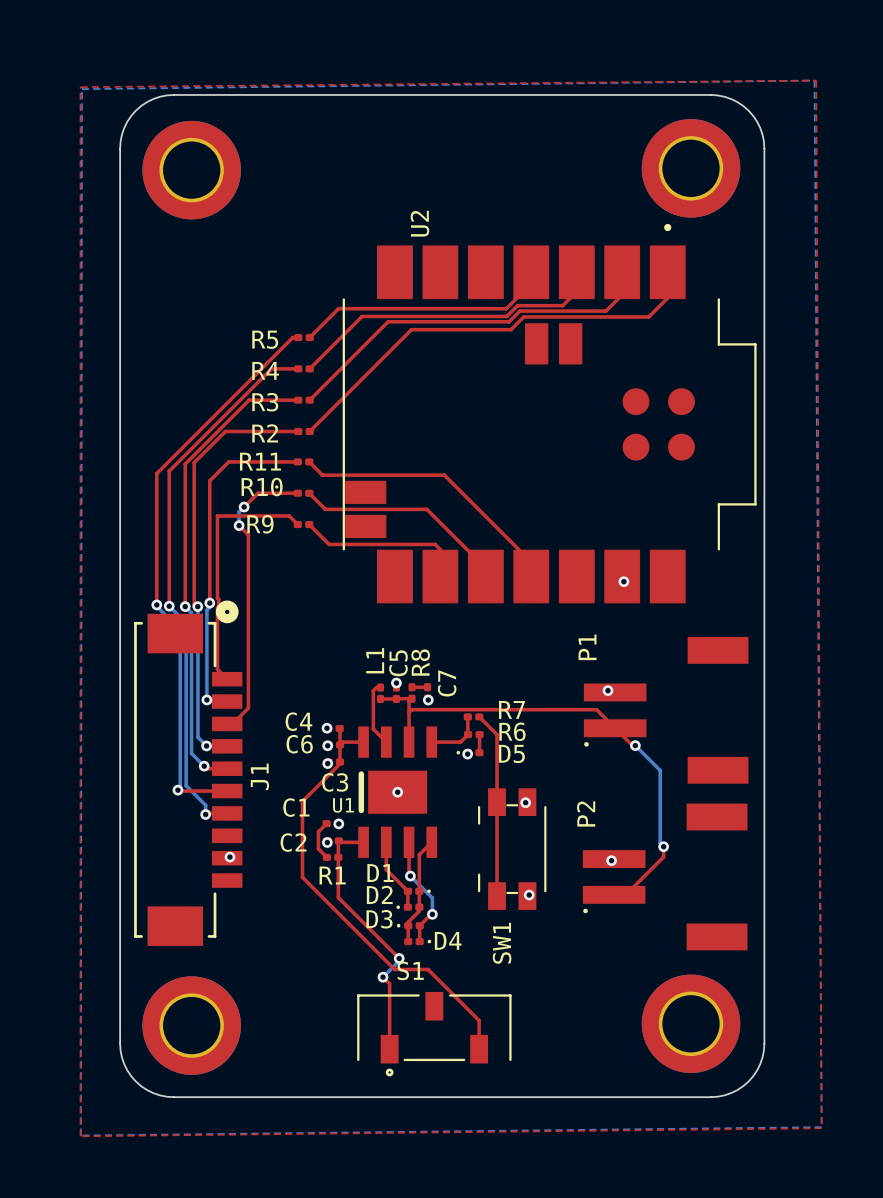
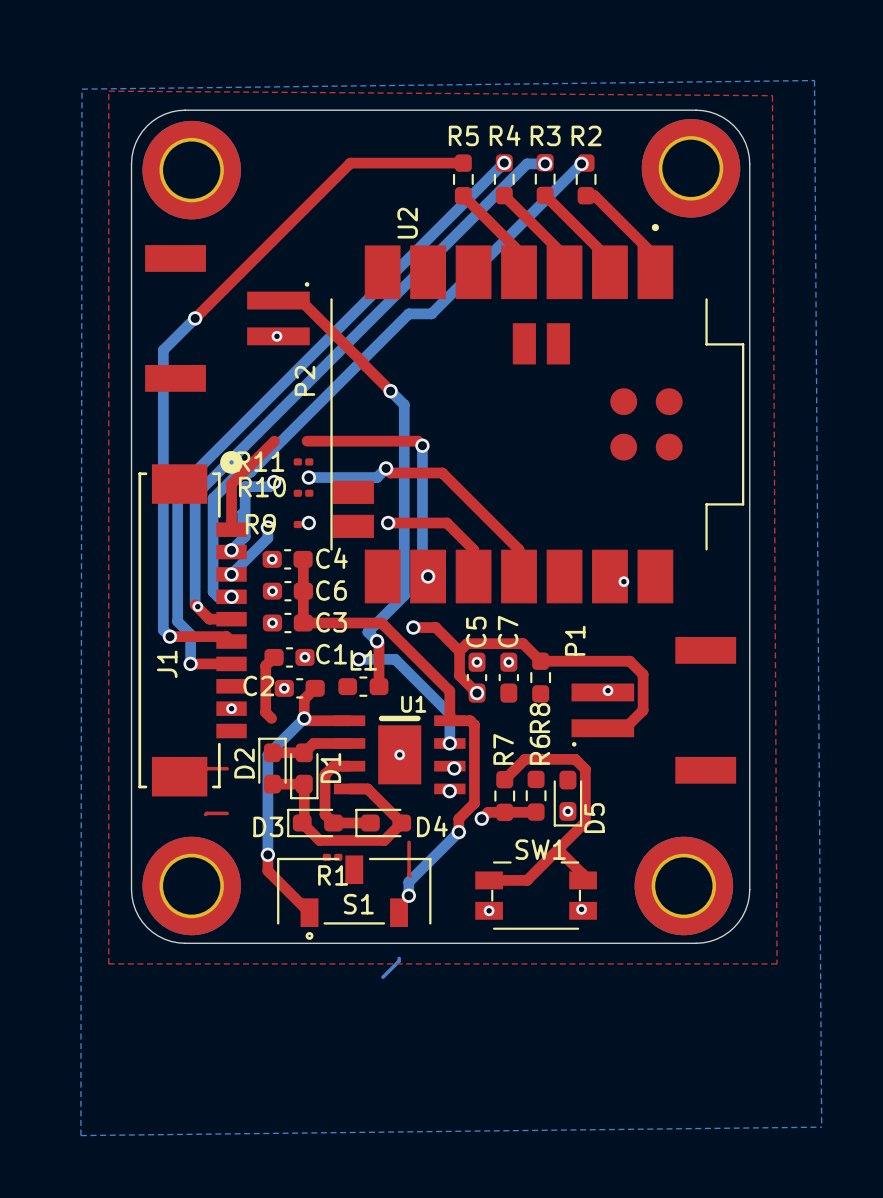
top zone outline: (816, 80) (80, 87) (80, 1136) (821, 1128) (816, 80) -> (108, 91) (108, 963) (777, 963) (772, 95) (108, 91)
board edge: (173, 94) (710, 94) (724, 96) (737, 102) (748, 110) (757, 121) (762, 134) (764, 148) (764, 1043) (762, 1057) (757, 1070) (748, 1081) (737, 1089) (724, 1095) (710, 1097) (173, 1097) (159, 1095) (146, 1089) (135, 1081) (127, 1070) (121, 1057) (120, 1043) (120, 148) (124, 128) (135, 110) (153, 99) (173, 94) -> (185, 110) (164, 114) (147, 125) (135, 143) (131, 163) (131, 889) (133, 903) (138, 916) (147, 927) (158, 936) (171, 941) (185, 943) (696, 943) (709, 941) (722, 936) (734, 927) (742, 916) (747, 903) (749, 889) (749, 163) (747, 149) (742, 137) (734, 125) (722, 117) (709, 112) (696, 110) (185, 110)
bottom track: none -> (504, 162) (177, 489) (177, 621) (190, 634) (190, 663)
via: none -> (504, 162)
top track: none -> (463, 163) (350, 163) (195, 318)
bottom track: none -> (545, 163) (527, 163) (195, 495) (195, 604)
via: none -> (545, 163)
bottom track: none -> (581, 163) (431, 313) (408, 313) (250, 472) (239, 472) (213, 498) (213, 591) (217, 596) (231, 596)
via: none -> (581, 163)
top track: none -> (463, 195) (519, 251) (519, 272)
top track: none -> (504, 195) (564, 255) (564, 272)
top track: none -> (545, 195) (609, 260) (609, 272)
top track: none -> (586, 195) (594, 195) (655, 256) (655, 272)
top track: (531, 272) (531, 283) (506, 308) (338, 308) (309, 337) -> none
top track: (576, 272) (576, 291) (562, 305) (517, 305) (506, 316) (362, 316) (309, 368) -> none
top track: (622, 272) (622, 294) (606, 311) (519, 311) (509, 321) (388, 321) (309, 400) -> none
top track: (667, 272) (667, 298) (648, 316) (523, 316) (510, 329) (411, 329) (309, 431) -> none
top track: none -> (278, 300) (300, 300) (390, 391)
bottom track: none -> (195, 318) (163, 350) (163, 630) (169, 636)
via: none -> (195, 318)
R5 footprint: [294, 333, 314, 342] -> [452, 154, 474, 205]
via: none -> (276, 336)
top track: (298, 337) (292, 337) (156, 473) (156, 604) -> none
R5 name position: R5 (265, 339) -> R5 (463, 135)
R4 footprint: [294, 365, 314, 373] -> [493, 154, 515, 205]
top track: (298, 368) (271, 368) (169, 471) (169, 606) -> none
R4 name position: R4 (265, 370) -> R4 (505, 135)
bottom track: none -> (390, 391) (404, 404) (404, 595) (367, 632) (377, 641)
via: none -> (390, 391)
R3 footprint: [294, 396, 314, 404] -> [534, 154, 556, 205]
top track: (298, 400) (249, 400) (185, 464) (185, 606) -> none
R3 name position: R3 (265, 402) -> R3 (545, 135)
U2 position: (549, 413) -> (537, 413)
R2 footprint: [294, 427, 314, 436] -> [575, 154, 597, 205]
top track: (298, 431) (225, 431) (194, 462) (194, 604) (197, 606) -> none
R2 name position: R2 (265, 433) -> R2 (586, 135)
top track: none -> (274, 441) (231, 484) (231, 529)
top track: none -> (307, 441) (417, 441) (422, 445)
bottom track: none -> (422, 445) (422, 570) (428, 576)
via: none -> (422, 445)
top track: (297, 461) (228, 461) (209, 480) (209, 603) -> none
top track: (309, 461) (322, 475) (444, 475) (531, 562) (531, 576) -> none
top track: none -> (386, 468) (390, 472) (442, 472) (519, 549) (519, 576)
bottom track: none -> (386, 468) (377, 477) (308, 477)
via: none -> (386, 468)
via: none -> (308, 477)
bottom track: none -> (274, 482) (269, 486) (245, 486) (245, 536) (231, 550)
via: none -> (274, 482)
top track: (297, 493) (257, 493) (244, 507) -> none
top track: (309, 493) (325, 509) (426, 509) (485, 568) (485, 576) -> none
via: (244, 507) -> none
via: none -> (308, 523)
top track: none -> (388, 523) (446, 523) (473, 549) (473, 576)
via: none -> (388, 523)
top track: (297, 524) (289, 515) (217, 515) (217, 669) (227, 679) -> none
top track: (309, 524) (329, 544) (435, 544) (440, 549) (440, 576) -> none
top track: (239, 525) (248, 534) (248, 708) (232, 723) (227, 723) -> none
via: (239, 525) -> none
bottom track: none -> (267, 527) (267, 538) (231, 574)
via: none -> (267, 527)
via: none -> (231, 550)
via: none -> (272, 559)
top track: none -> (303, 559) (303, 623) (381, 623) (449, 691) (449, 720) (470, 720) (474, 725) (474, 803) (458, 818) (458, 832)
via: none -> (231, 574)
via: none -> (428, 576)
via: none -> (272, 591)
via: none -> (231, 596)
bottom track: (209, 603) (209, 607) (206, 610) (206, 699) -> none
via: (209, 603) -> none
bottom track: (156, 604) (180, 629) (180, 787) (177, 790) -> none
via: (156, 604) -> none
top track: none -> (195, 604) (209, 619) (231, 619)
bottom track: (169, 606) (186, 623) (186, 785) (205, 805) (205, 814) -> none
via: (169, 606) -> none
bottom track: (185, 606) (191, 613) (191, 753) (204, 766) -> none
via: (185, 606) -> none
bottom track: (197, 606) (197, 737) (206, 745) -> none
via: none -> (272, 623)
top track: none -> (413, 627) (435, 627) (459, 651)
via: none -> (413, 627)
top track: none -> (169, 636) (226, 636) (231, 641)
via: none -> (169, 636)
top track: none -> (377, 641) (379, 643) (379, 686)
via: none -> (377, 641)
P1 name position: P1 (587, 647) -> P1 (575, 640)
top track: none -> (459, 651) (467, 643) (523, 643) (540, 661) (629, 661) (643, 674) (643, 710) (625, 728) (602, 728)
top track: none -> (459, 651) (459, 675) (477, 693)
top track: none -> (274, 657) (265, 665) (265, 712) (271, 718)
via: none -> (304, 657)
bottom track: none -> (358, 659) (395, 659) (449, 714) (449, 743)
via: none -> (358, 659)
R8 name position: R8 (420, 662) -> R8 (539, 718)
via: none -> (477, 662)
via: none -> (508, 662)
top track: none -> (190, 663) (231, 663)
via: none -> (190, 663)
L1 footprint: [376, 683, 385, 704] -> [338, 676, 389, 697]
C5 footprint: [392, 683, 401, 704] -> [466, 652, 488, 703]
via: (396, 683) -> none
R8 footprint: [408, 683, 416, 703] -> [530, 652, 552, 703]
C7 footprint: [423, 683, 432, 703] -> [498, 652, 520, 703]
C7 name position: C7 (447, 683) -> C7 (508, 631)
top track: (380, 687) (376, 687) (373, 690) (373, 729) (386, 742) -> none
top track: (412, 687) (427, 687) -> none
via: none -> (284, 688)
top track: none -> (315, 688) (304, 699) (304, 718) (306, 720) (349, 720)
via: none -> (477, 693)
top track: (380, 698) (412, 698) (409, 701) (409, 742) -> none
via: (206, 699) -> none
via: (428, 700) -> none
via: none -> (231, 708)
R7 name position: R7 (511, 709) -> R7 (503, 749)
P1 position: (666, 710) -> (653, 710)
top track: (409, 712) (411, 709) (596, 709) (632, 745) (635, 745) -> none
R7 footprint: [463, 713, 484, 721] -> [494, 770, 516, 822]
top track: (467, 716) (468, 734) (460, 742) (431, 742) -> none
top track: (479, 716) (497, 734) (497, 896) -> none
bottom track: none -> (304, 718) (267, 754) (267, 854)
via: none -> (304, 718)
C4 name position: C4 (298, 721) -> C4 (331, 558)
C4 footprint: [324, 725, 344, 733] -> [262, 549, 313, 570]
via: (326, 728) -> none
top track: (339, 728) (340, 744) -> none
R6 footprint: [463, 731, 484, 739] -> [525, 770, 547, 821]
R6 name position: R6 (512, 731) -> R6 (539, 749)
top track: (479, 734) (479, 752) -> none
C6 footprint: [324, 741, 345, 749] -> [262, 580, 313, 602]
top track: (363, 742) (342, 742) (339, 744) (339, 763) (302, 801) (302, 877) (394, 969) (428, 969) (479, 1020) (479, 1049) -> none
top track: none -> (349, 743) (313, 743) (304, 752) (272, 752)
via: none -> (449, 743)
C6 name position: C6 (299, 744) -> C6 (331, 590)
via: (206, 745) -> none
via: (327, 745) -> none
bottom track: (635, 745) (660, 770) (660, 843) (663, 846) -> none
via: (635, 745) -> none
D5 footprint: [456, 749, 484, 757] -> [553, 770, 583, 827]
via: none -> (399, 754)
via: (467, 754) -> none
C3 footprint: [324, 758, 345, 766] -> [262, 612, 313, 634]
via: (327, 763) -> none
via: (204, 766) -> none
top track: none -> (349, 766) (333, 766) (325, 774) (325, 814) (333, 823) (370, 823)
via: none -> (454, 768)
J1 position: (188, 773) -> (192, 623)
J1 name position: J1 (259, 776) -> J1 (167, 664)
top track: none -> (504, 779) (525, 759) (575, 759) (585, 769) (585, 822) (527, 880) (489, 880)
C3 name position: C3 (335, 782) -> C3 (331, 622)
top track: none -> (272, 784) (304, 784) (304, 821) (302, 823) (319, 840) (384, 840) (401, 823) (367, 788) (349, 788)
top track: (177, 790) (227, 791) -> none
via: (177, 790) -> none
via: none -> (449, 791)
U1 rotation: 0° (397, 792) -> 90° clockwise (399, 754)
via: (397, 792) -> none
via: (525, 802) -> none
C1 name position: C1 (296, 807) -> C1 (331, 654)
via: none -> (567, 811)
top track: none -> (536, 812) (488, 812) (481, 818)
via: (205, 814) -> none
via: none -> (481, 818)
C1 footprint: [322, 820, 343, 828] -> [264, 647, 315, 668]
top track: (326, 823) (318, 831) (318, 848) (326, 857) -> none
via: (338, 823) -> none
bottom track: none -> (458, 832) (408, 882) (408, 895)
via: none -> (458, 832)
C2 footprint: [323, 837, 344, 845] -> [274, 678, 325, 699]
via: (327, 842) -> none
top track: (363, 842) (338, 841) (338, 897) (399, 958) -> none
top track: (386, 842) (386, 869) (407, 891) (407, 907) -> none
top track: (431, 842) (419, 854) (419, 911) (408, 922) (408, 941) -> none
top track: (663, 846) (663, 857) (625, 894) (614, 894) -> none
via: (663, 846) -> none
SW1 rotation: 0° (512, 849) -> 90° clockwise (536, 895)
top track: none -> (558, 849) (583, 874) (583, 880)
top track: none -> (267, 854) (267, 871) (309, 912)
via: none -> (267, 854)
via: (229, 857) -> none
via: (611, 860) -> none
D1 name position: D1 (380, 873) -> D1 (330, 768)
bottom track: (410, 876) (432, 898) (432, 914) -> none
via: (410, 876) -> none
P2 rotation: 0° (665, 876) -> 180° (227, 318)
P2 position: (665, 876) -> (227, 318)
D1 footprint: [403, 887, 431, 895] -> [290, 743, 319, 800]
via: none -> (408, 895)
via: (529, 895) -> none
D2 footprint: [396, 903, 424, 911] -> [258, 737, 287, 794]
via: none -> (581, 909)
via: none -> (489, 910)
top track: (432, 914) (419, 925) (419, 941) -> none
via: (432, 914) -> none
D3 footprint: [396, 922, 424, 930] -> [287, 808, 343, 838]
D4 footprint: [404, 937, 432, 946] -> [355, 808, 412, 838]
SW1 name position: SW1 (502, 943) -> SW1 (540, 849)
via: (399, 958) -> none
S1 name position: S1 (410, 970) -> S1 (358, 904)
top track: (383, 977) (389, 983) (389, 1049) -> none
via: (383, 977) -> none
part position: (691, 1023) -> (683, 886)
part position: (191, 1025) -> (191, 886)
S1 position: (434, 1034) -> (354, 897)

